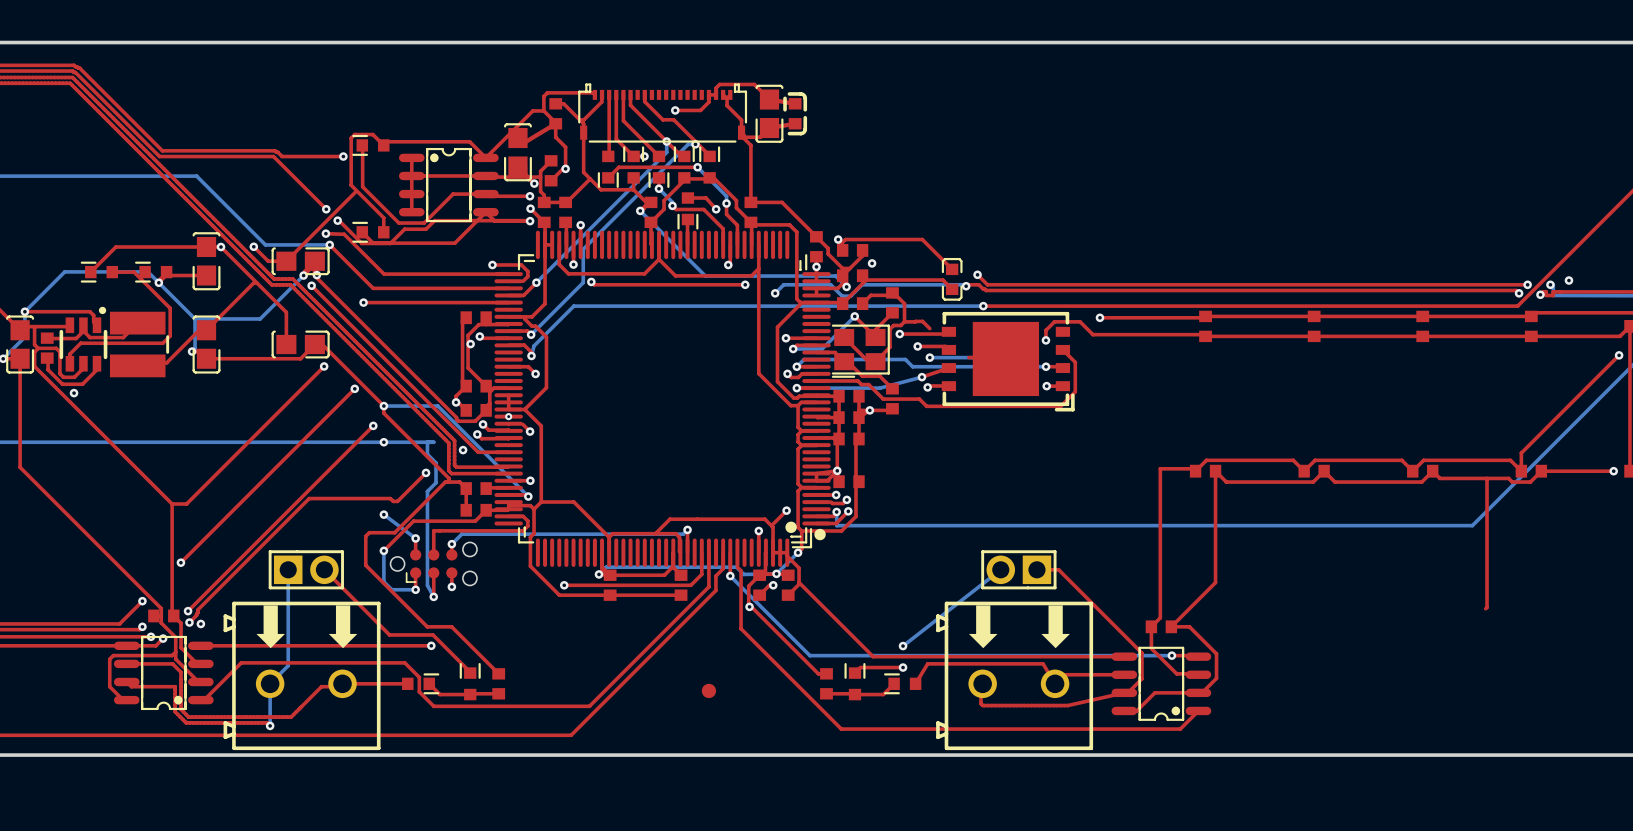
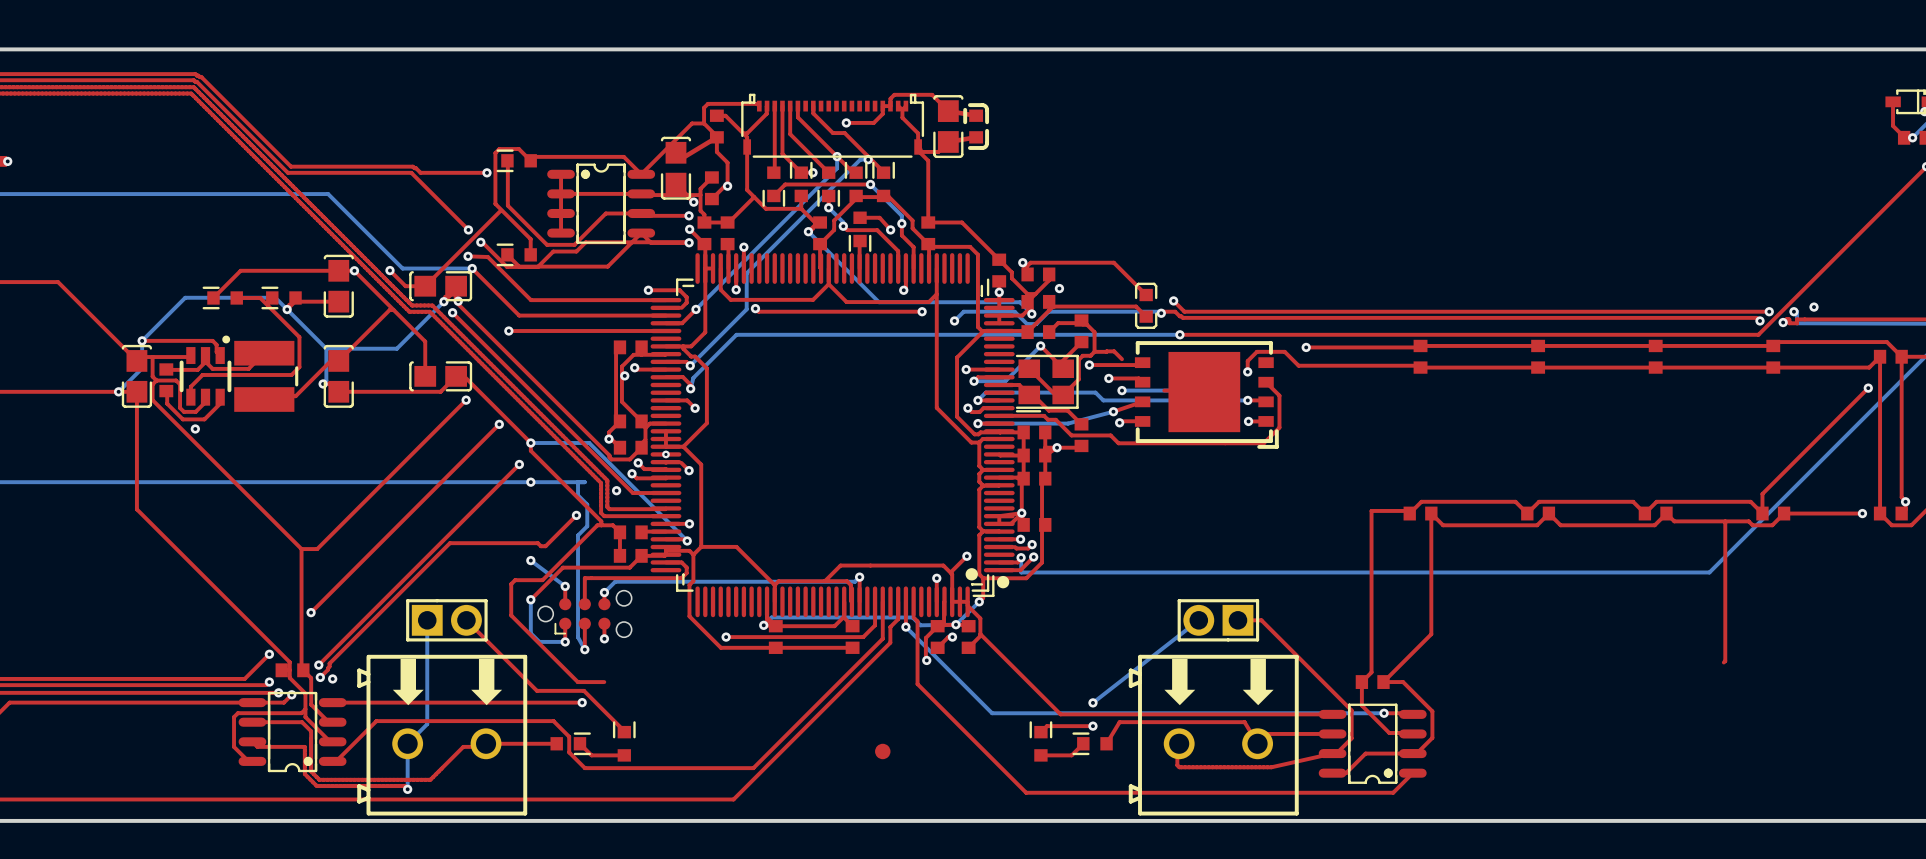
top track: (748, 604) (818, 673) (826, 673) -> none
top track: (451, 626) (498, 673) -> none
part: (498, 683) -> none
part: (826, 683) -> none
top track: (498, 693) (470, 694) -> none
top track: (826, 693) (854, 694) -> none

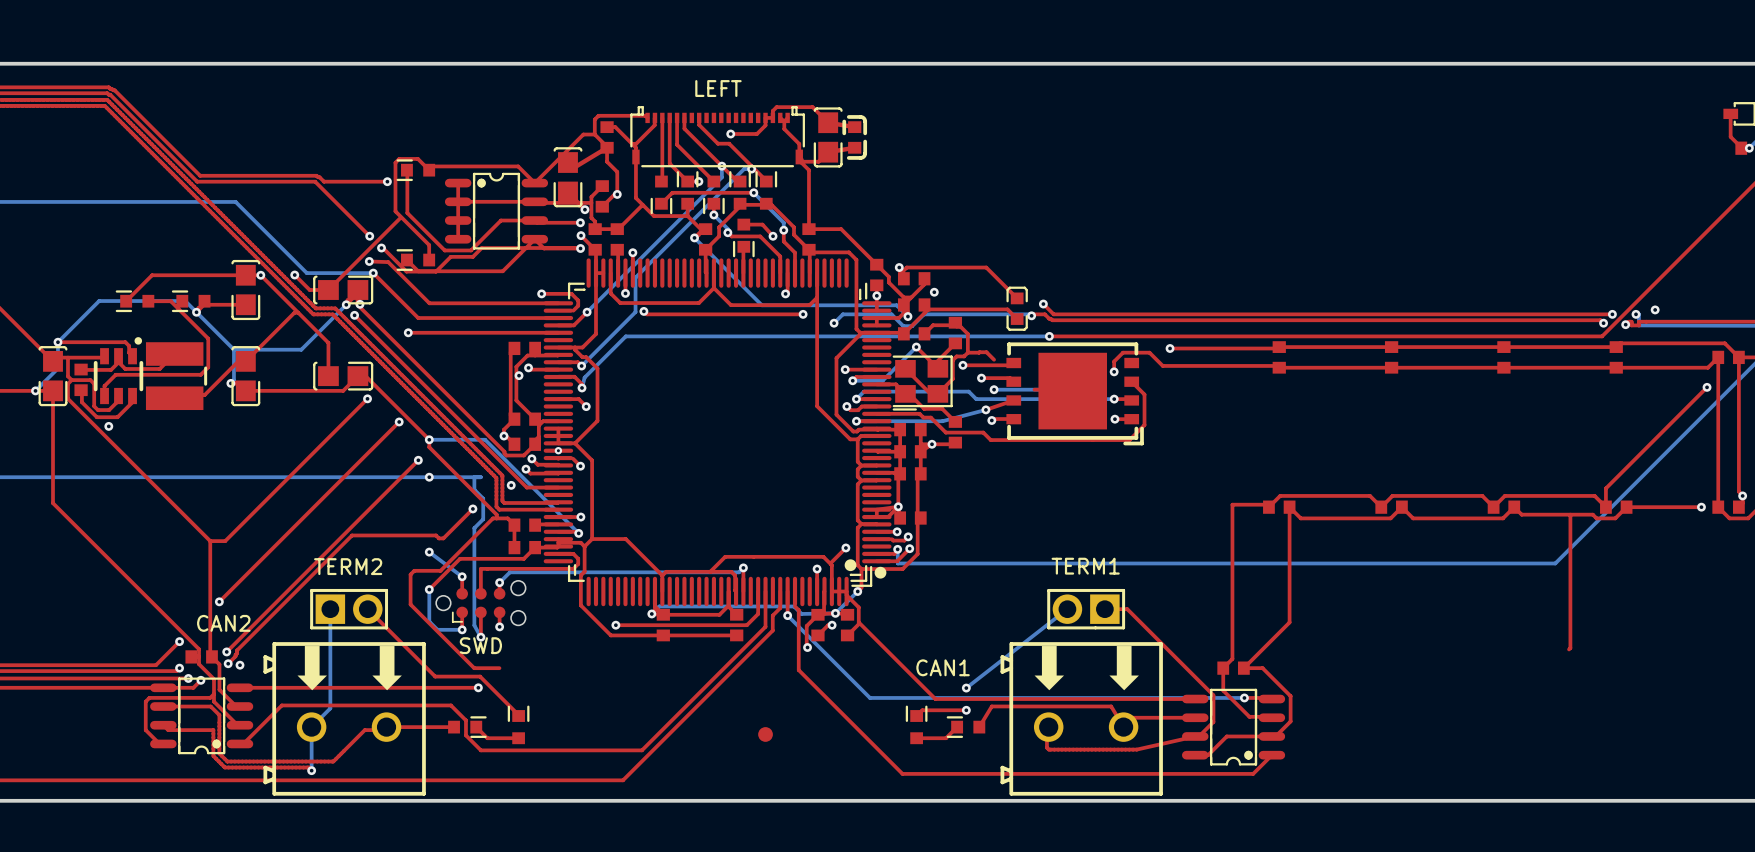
text: none -> LEFT (718, 88)
text: none -> TERM2 (348, 566)
text: none -> TERM1 (1085, 566)
text: none -> CAN2 (223, 623)
text: none -> SWD (480, 645)
text: none -> CAN1 (943, 667)

